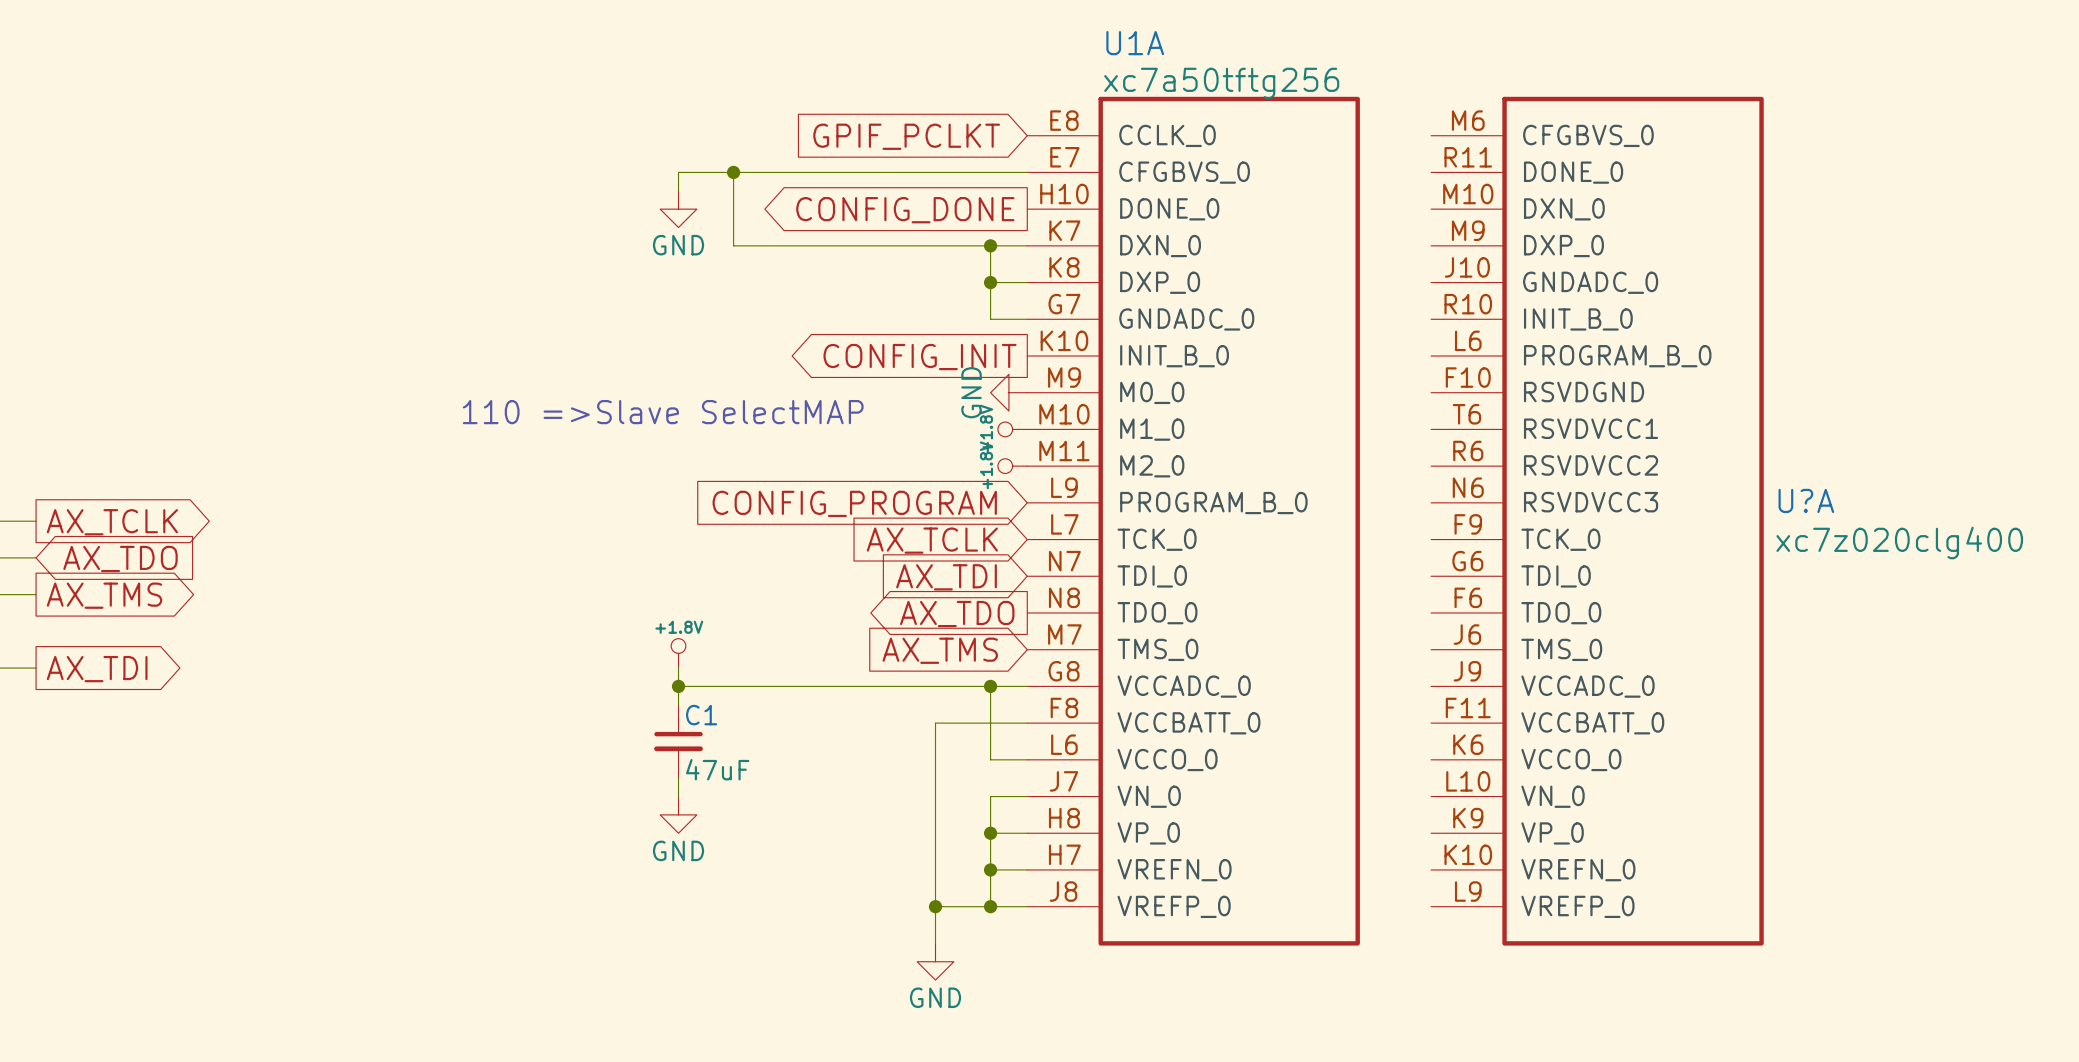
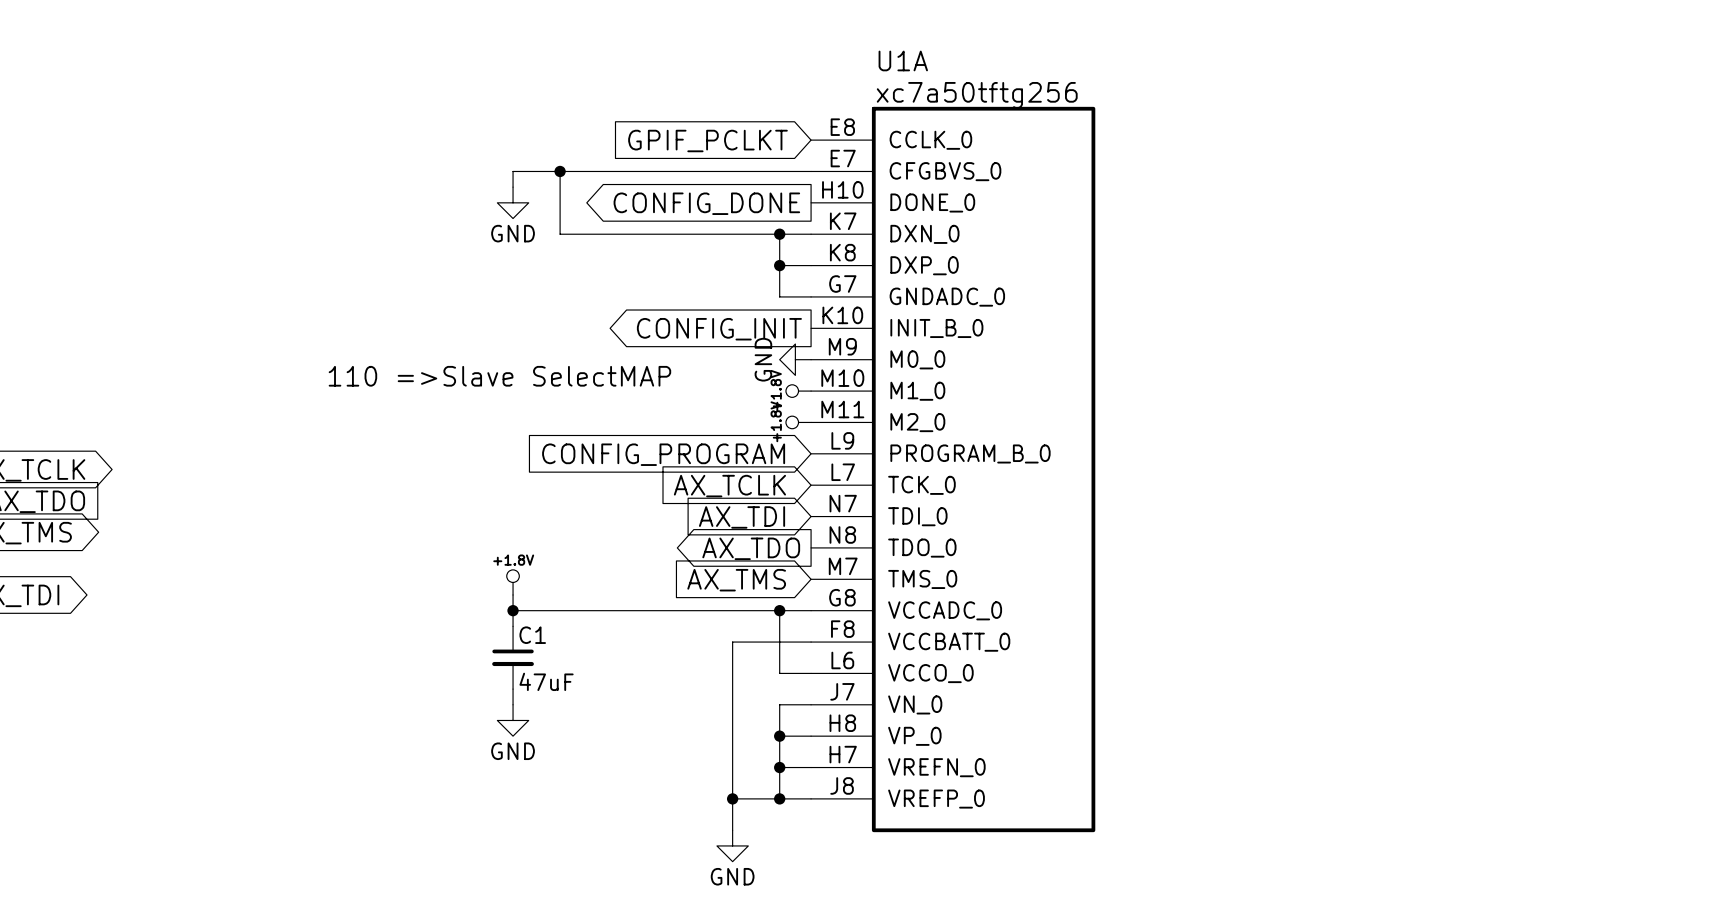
U?A: xc7z020clg400 (1597, 521) -> none

